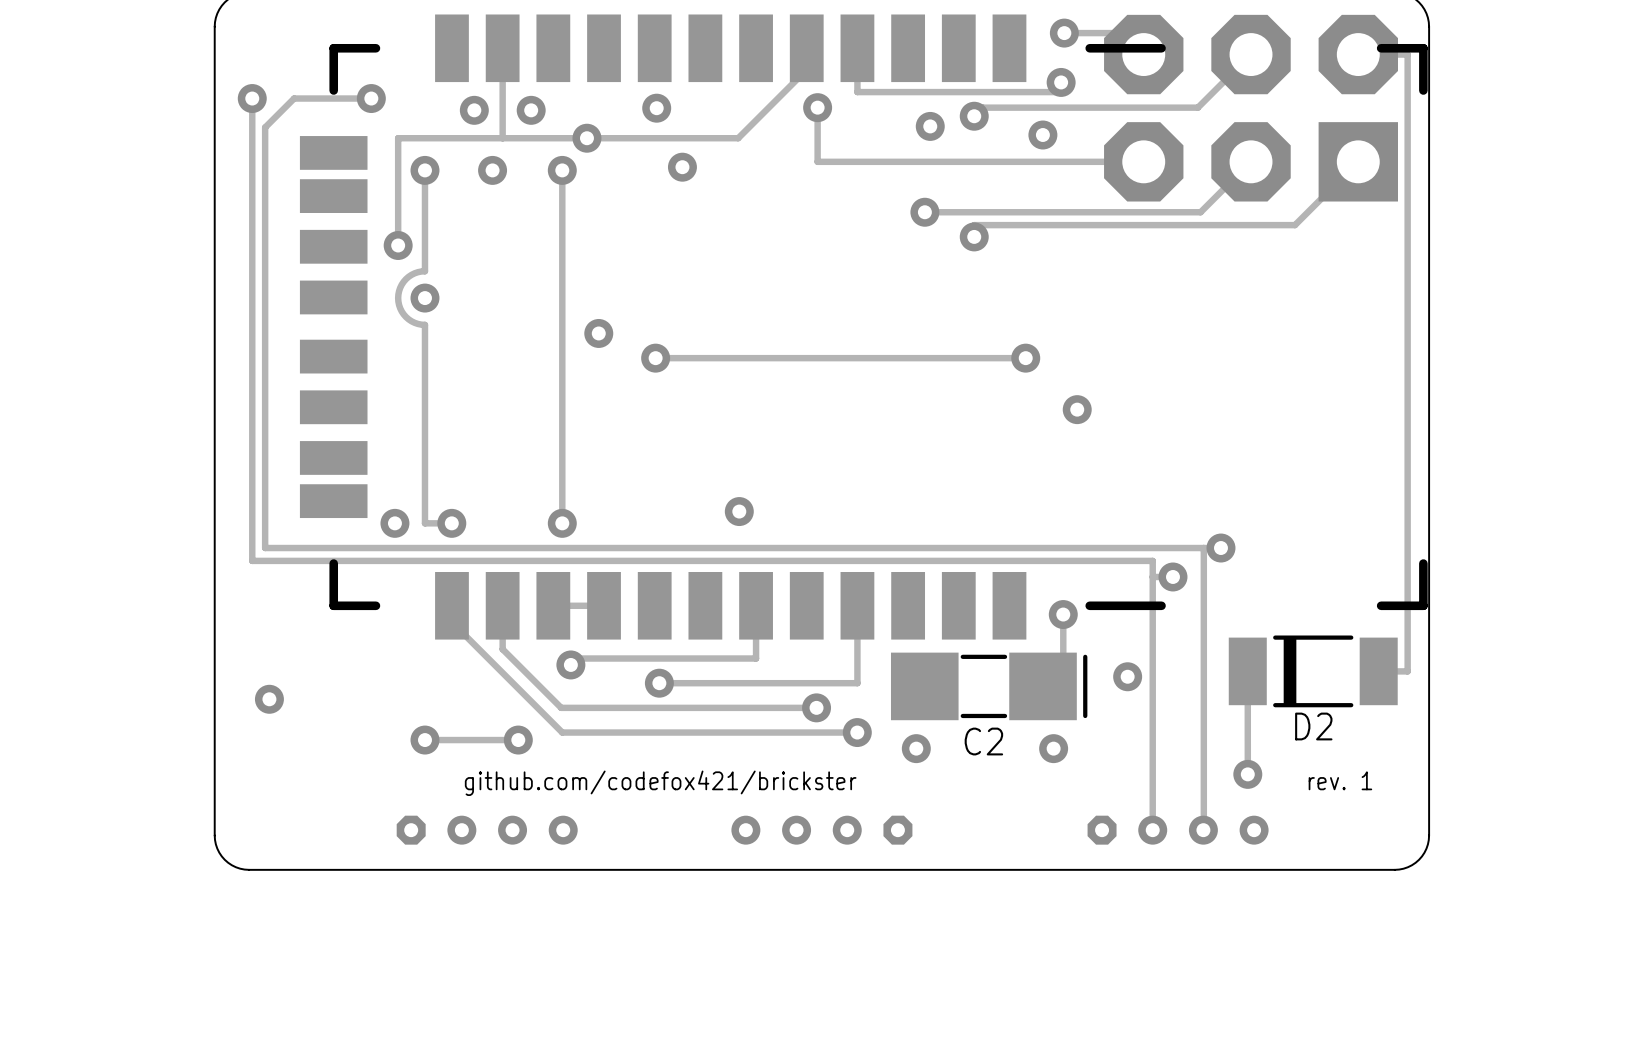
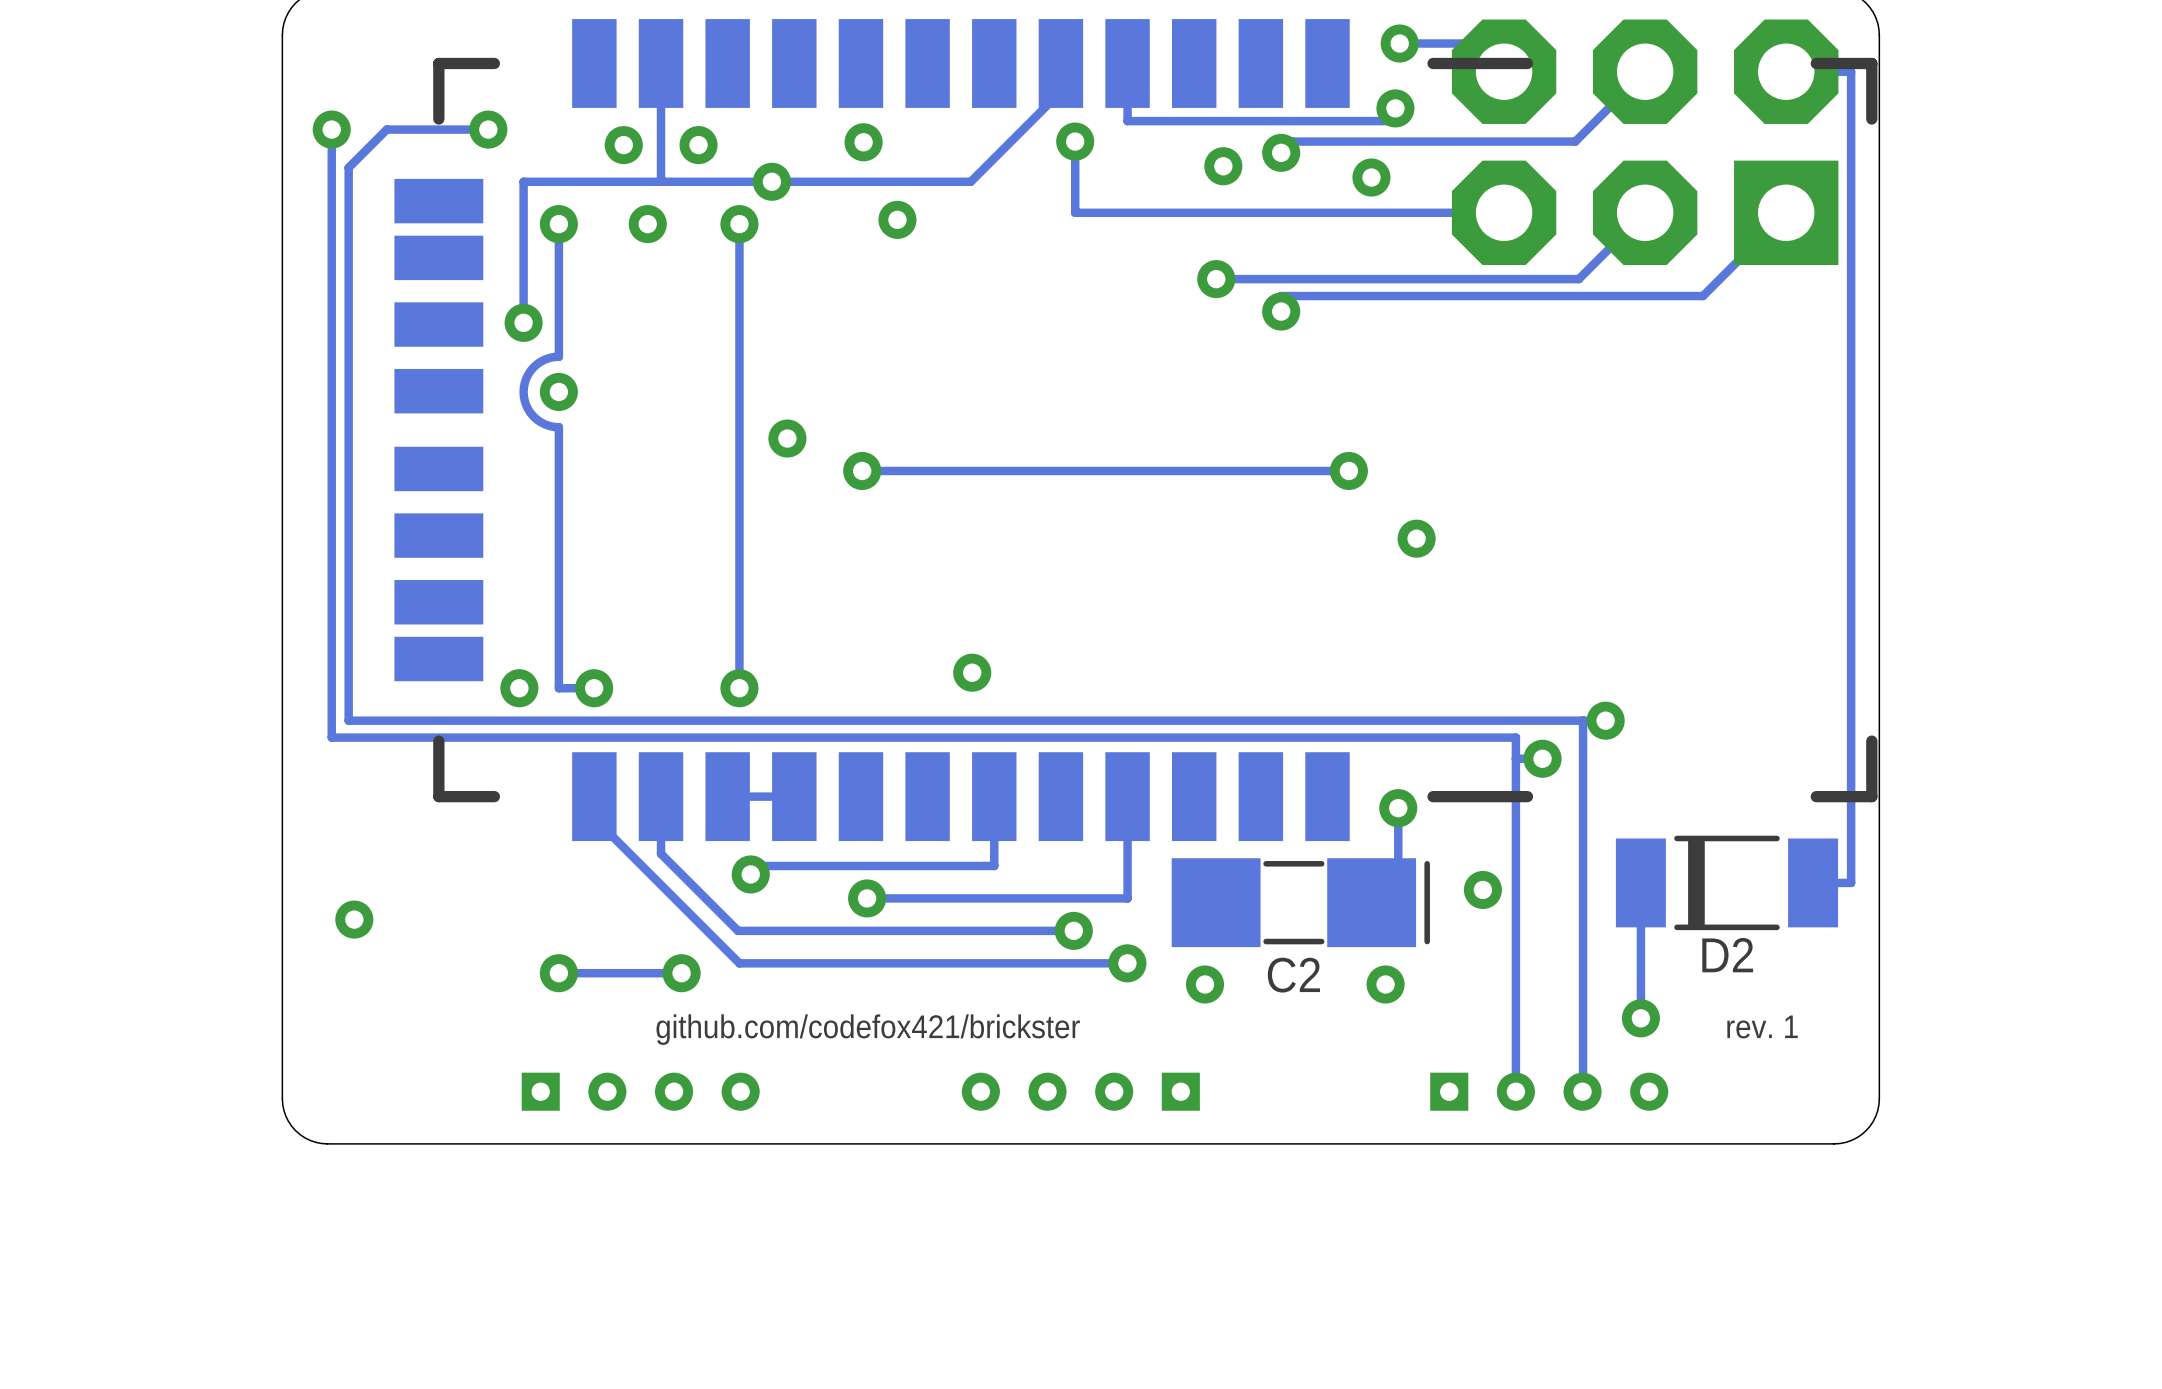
part footprint: [396, 815, 578, 845] -> [521, 1072, 760, 1111]
part footprint: [731, 815, 913, 845] -> [961, 1072, 1200, 1111]
part footprint: [1087, 815, 1269, 845] -> [1430, 1072, 1669, 1111]

